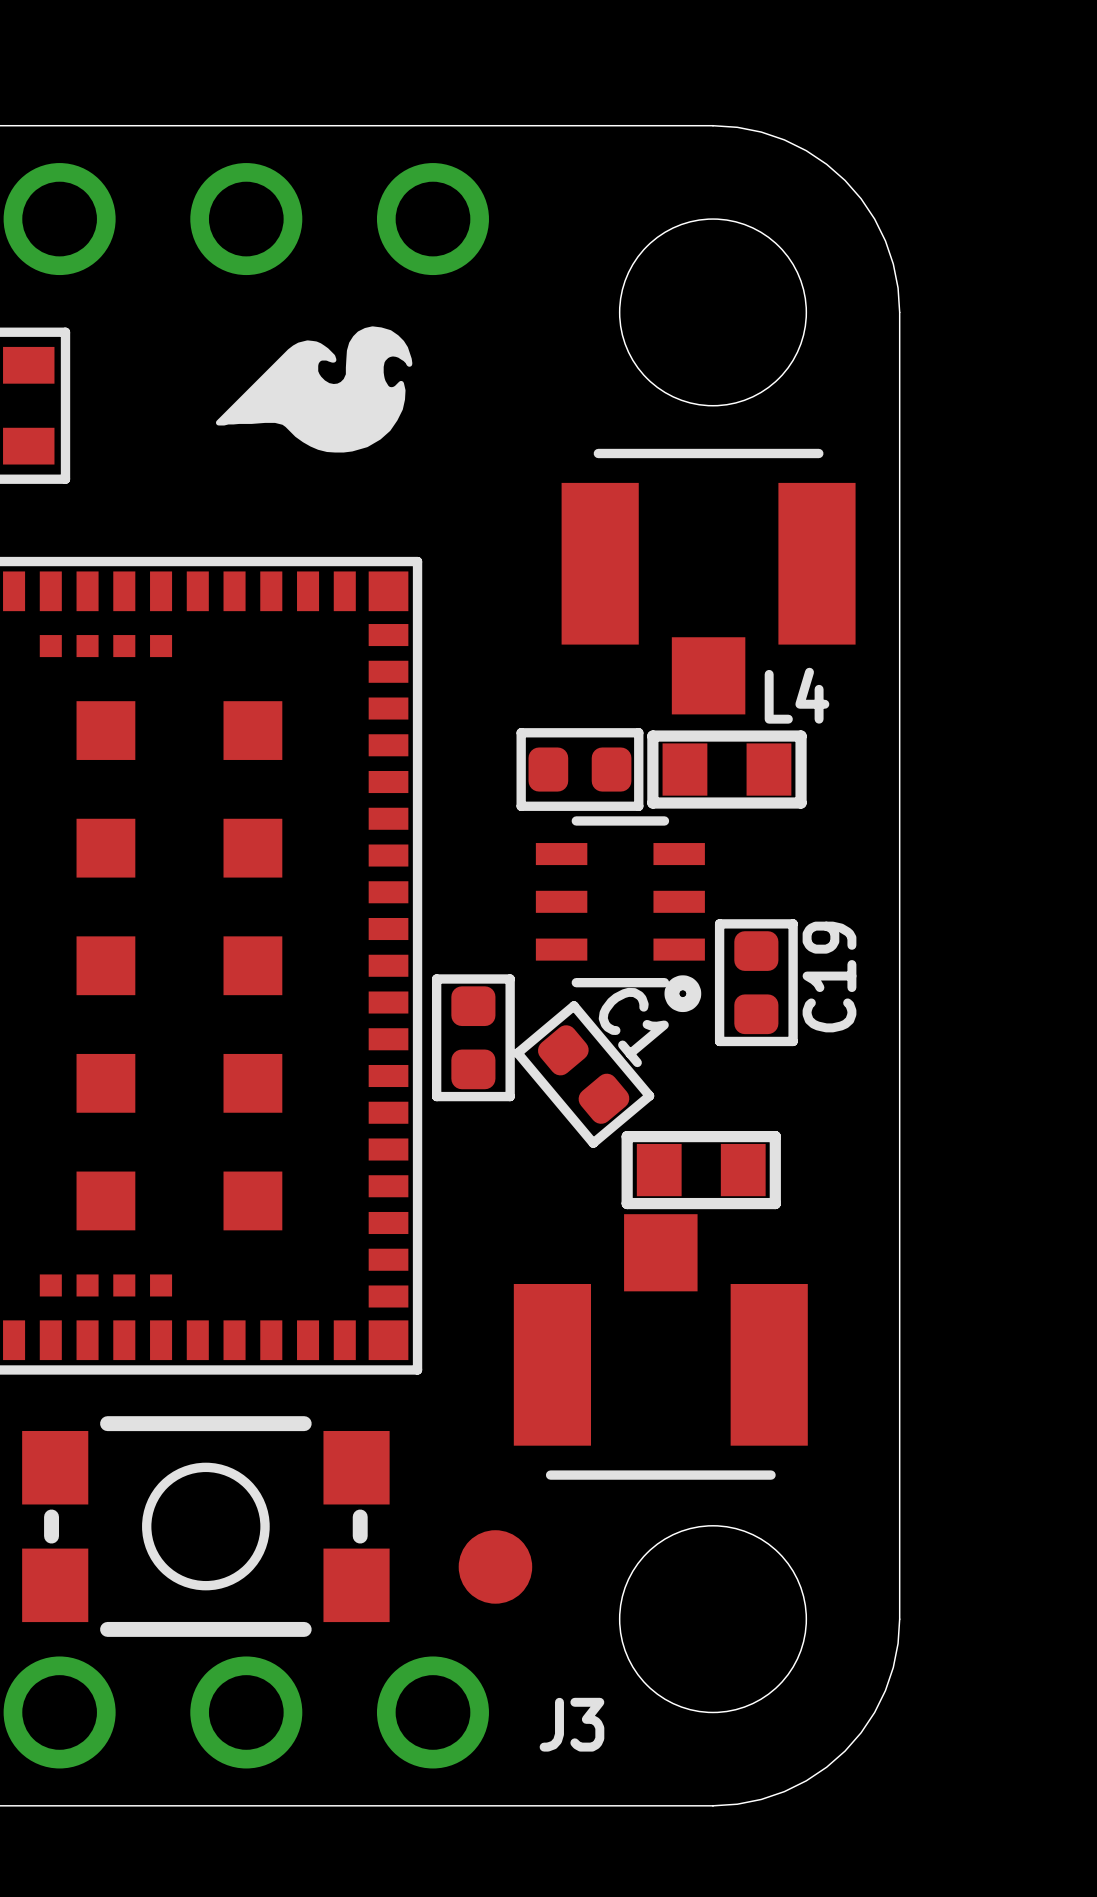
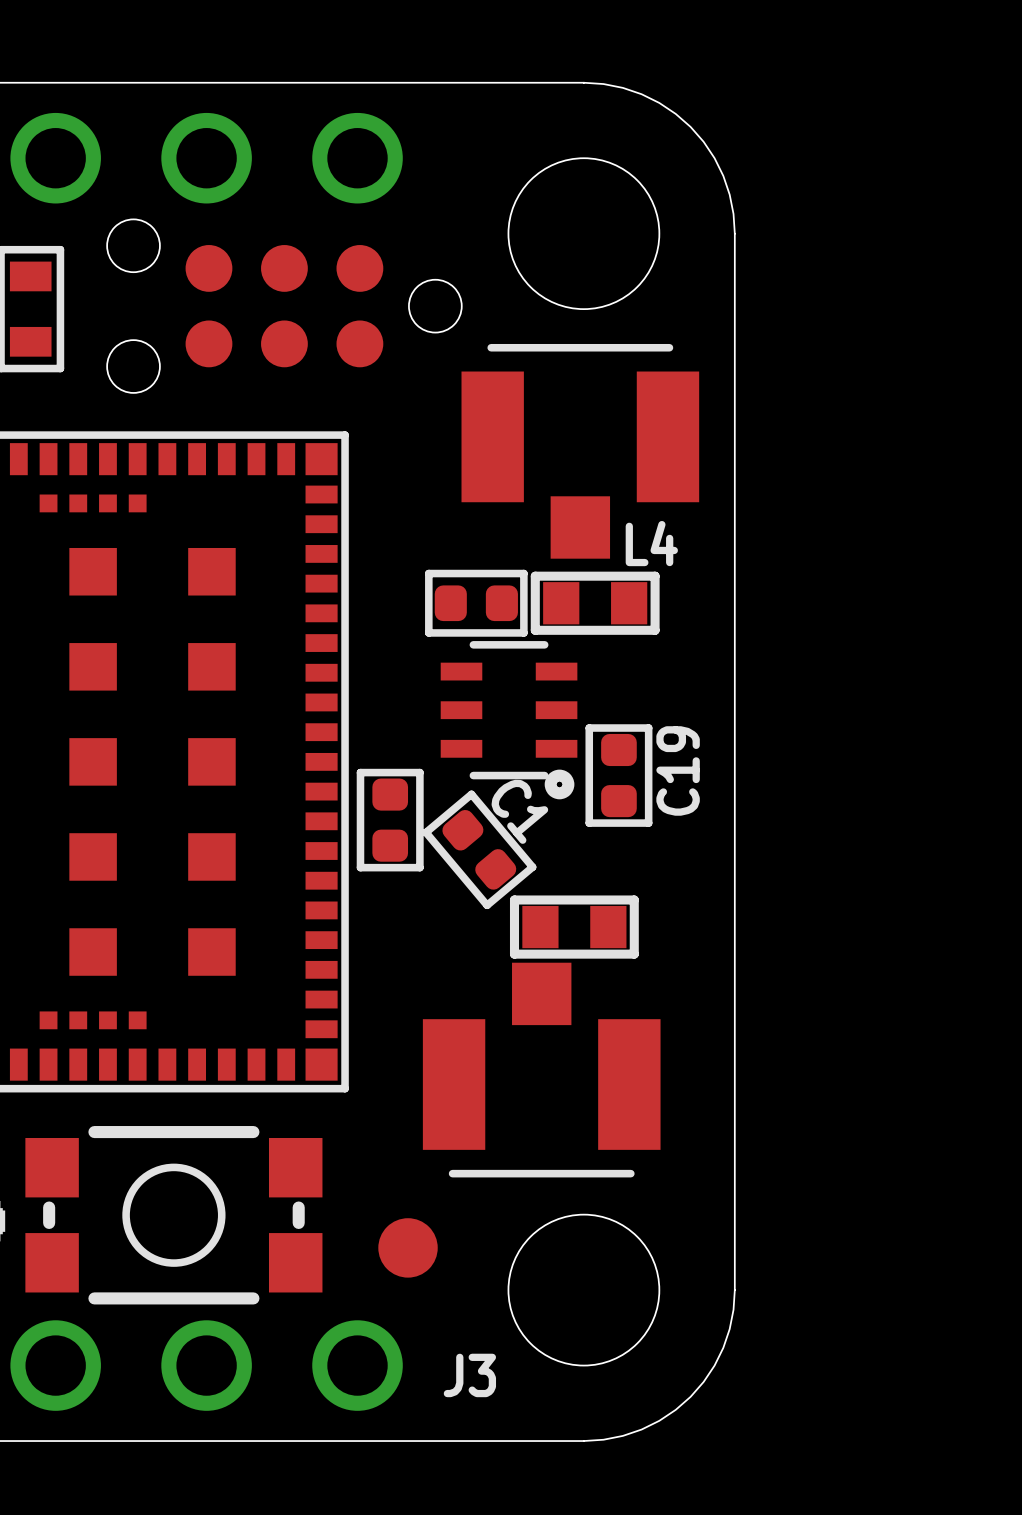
drawing: [215, 326, 413, 453] -> none
part: none -> (284, 306)

